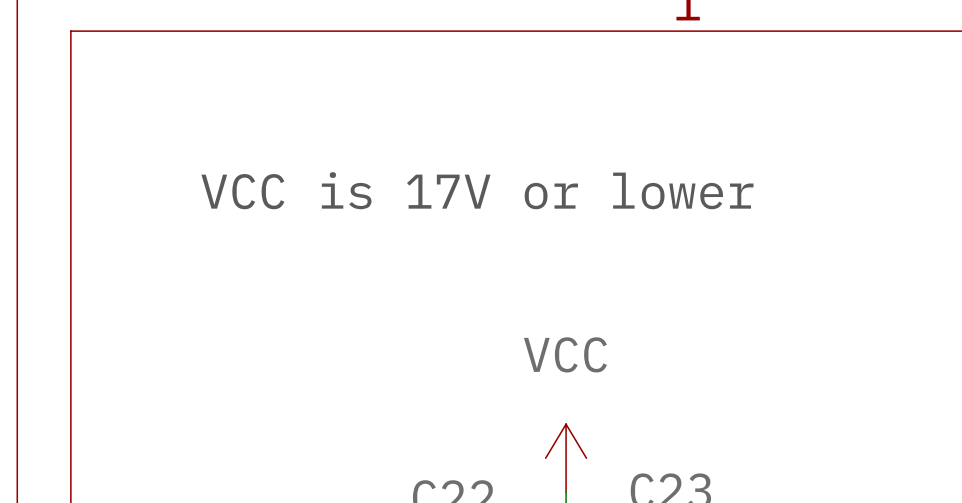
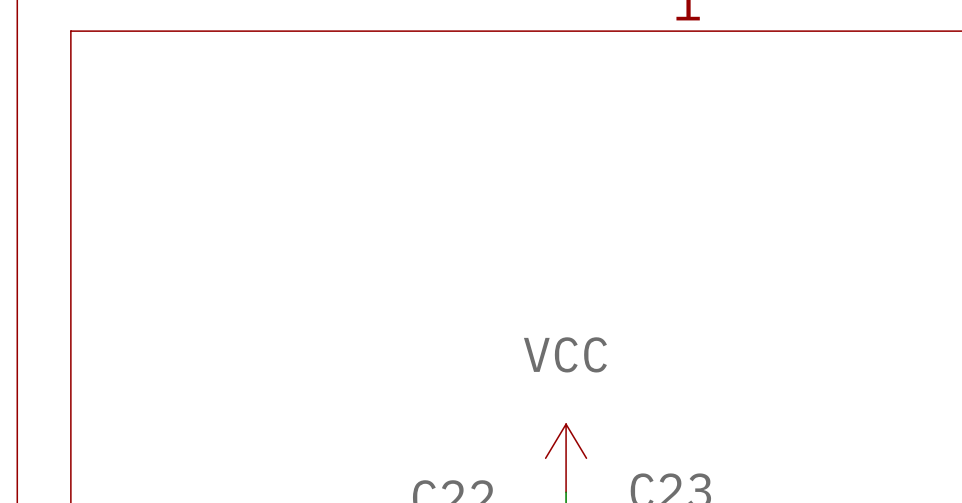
text: VCC is 17V or lower (477, 190) -> none

